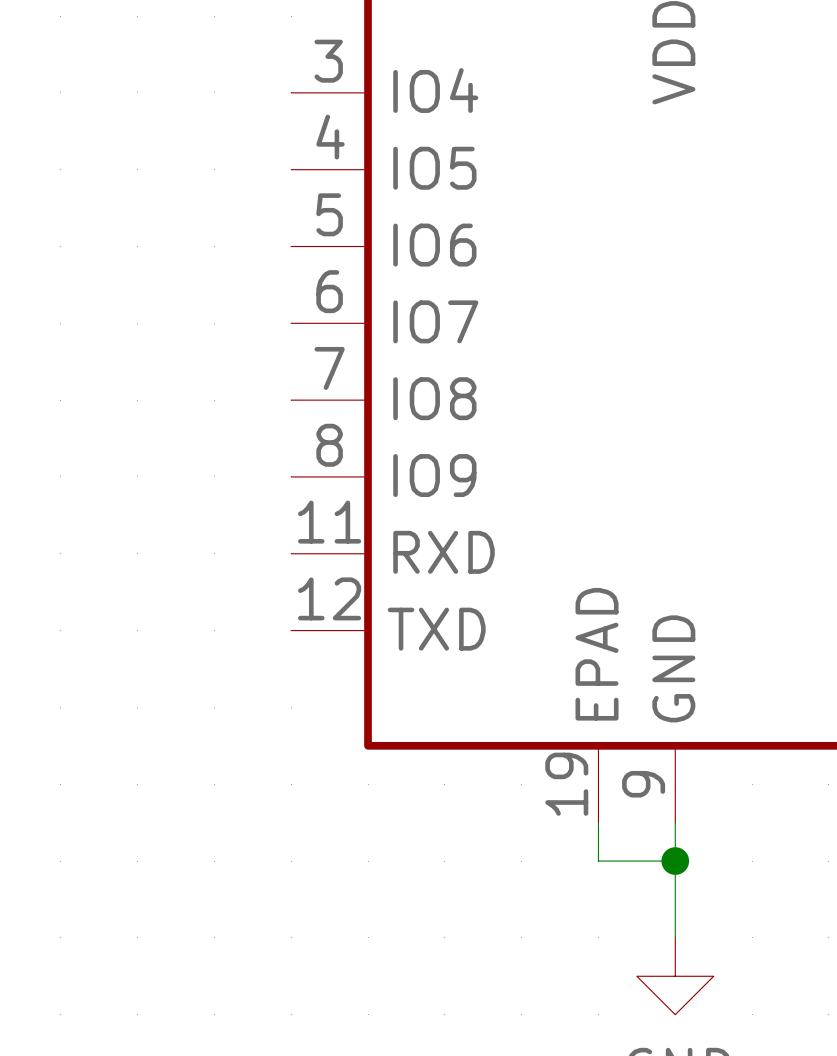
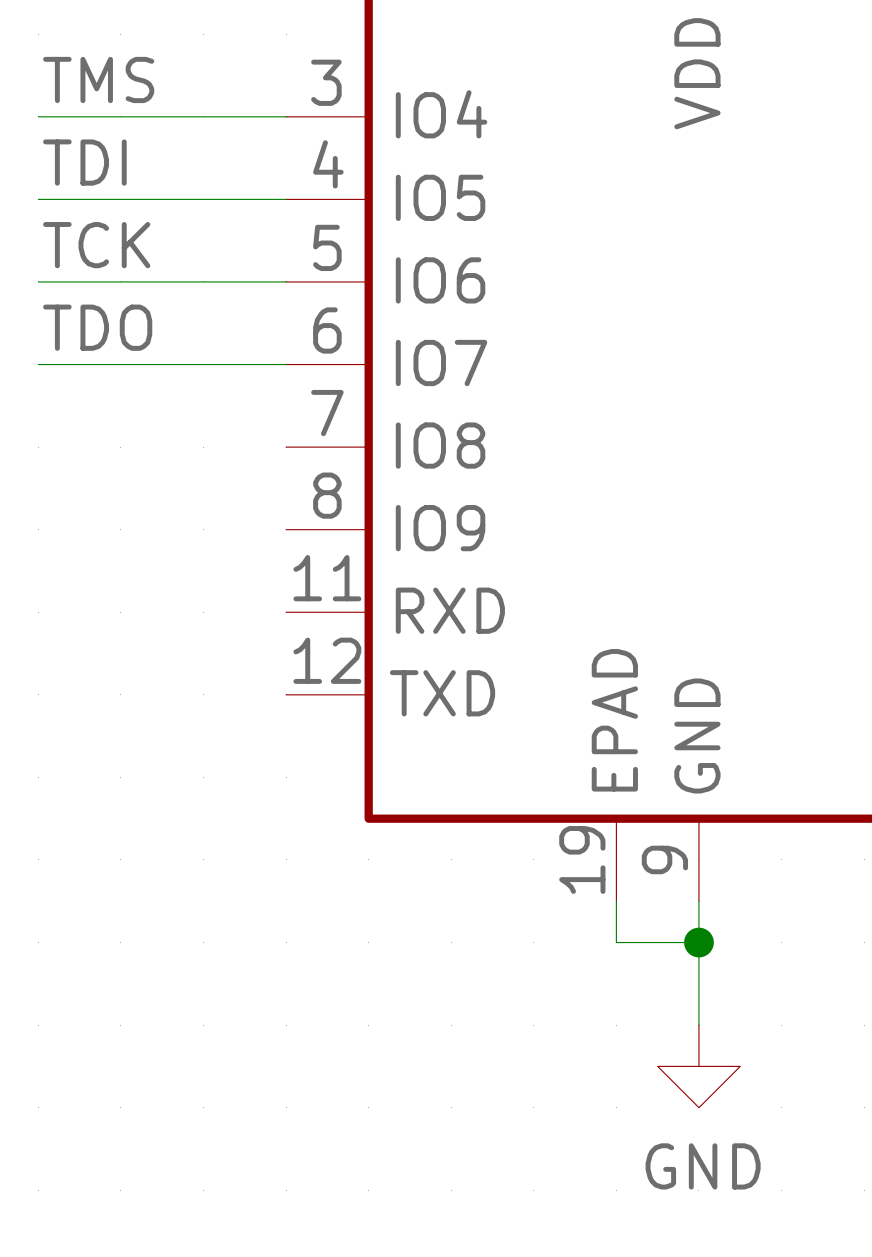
label: none -> TMS (98, 79)
wire: none -> (38, 116) (286, 116)
label: none -> TDI (84, 162)
wire: none -> (38, 199) (286, 199)
label: none -> TCK (96, 245)
wire: none -> (38, 281) (286, 281)
label: none -> TDO (97, 327)
wire: none -> (38, 364) (286, 364)

